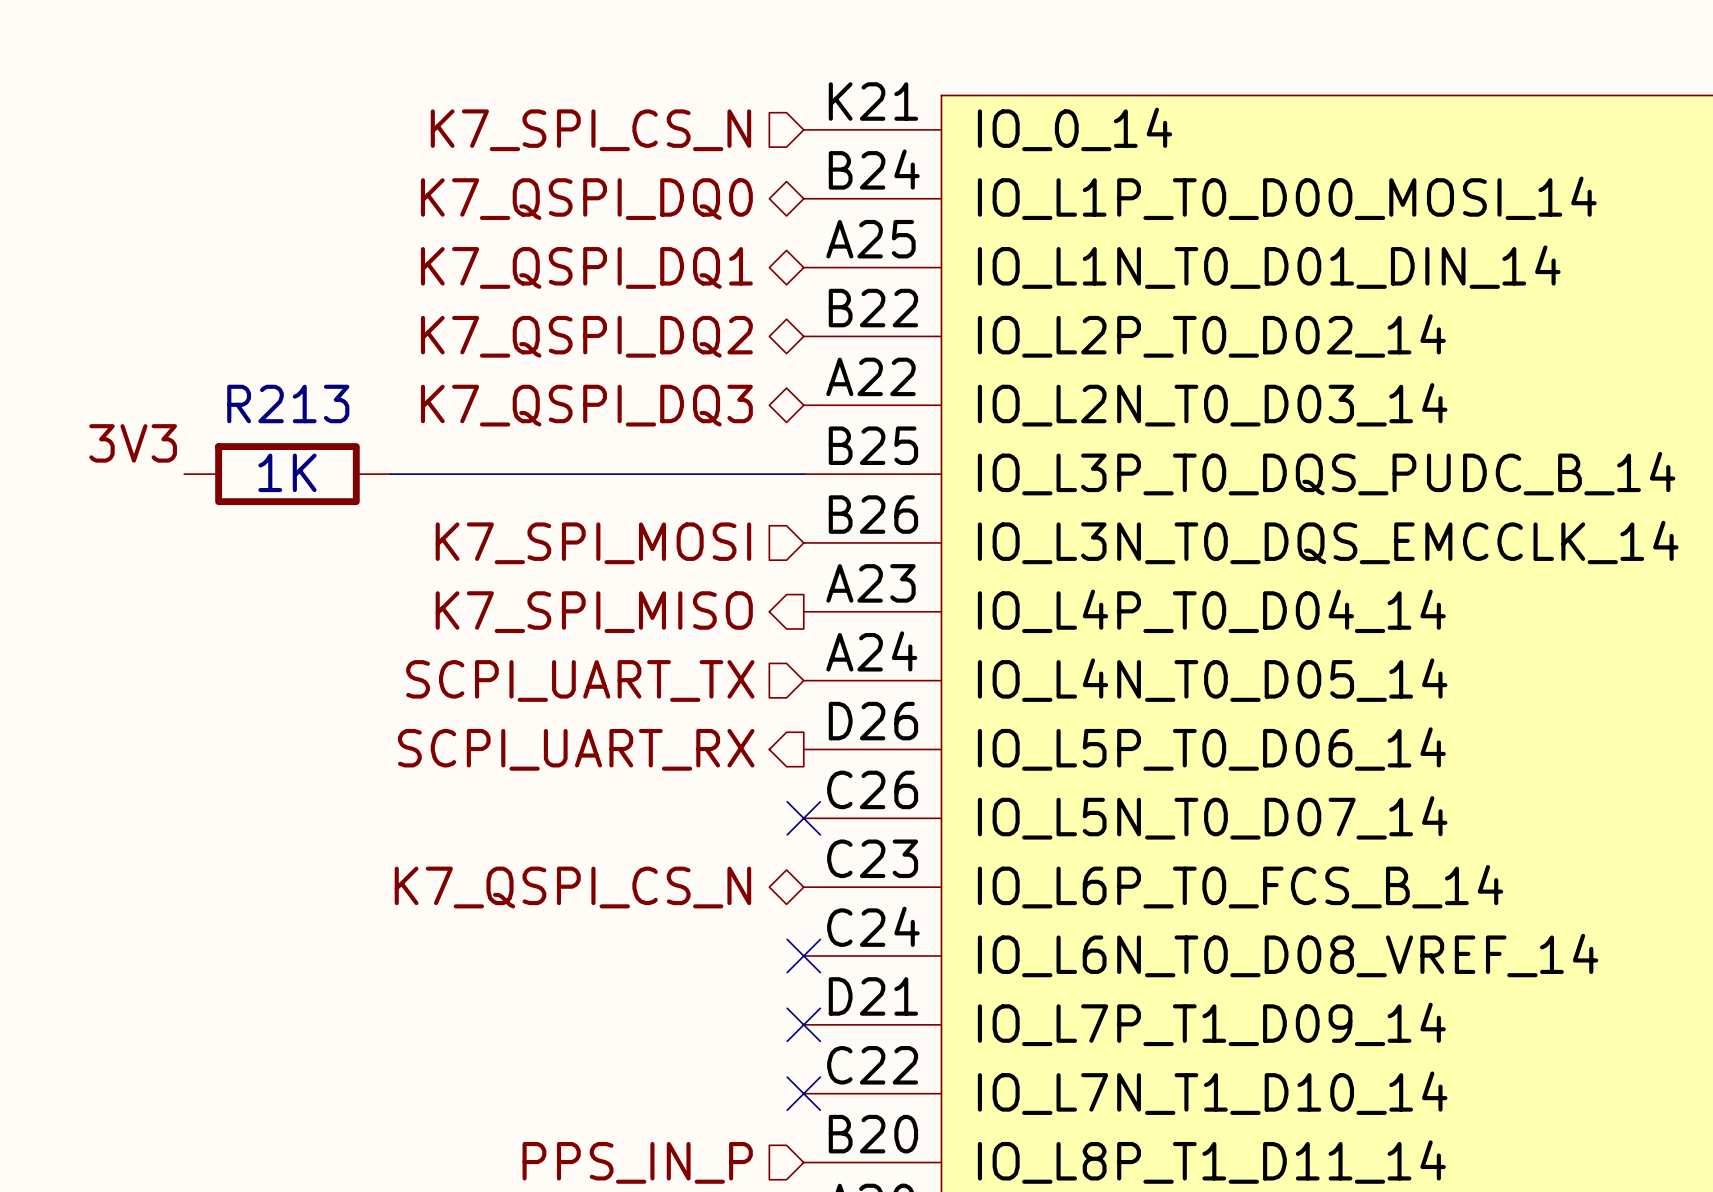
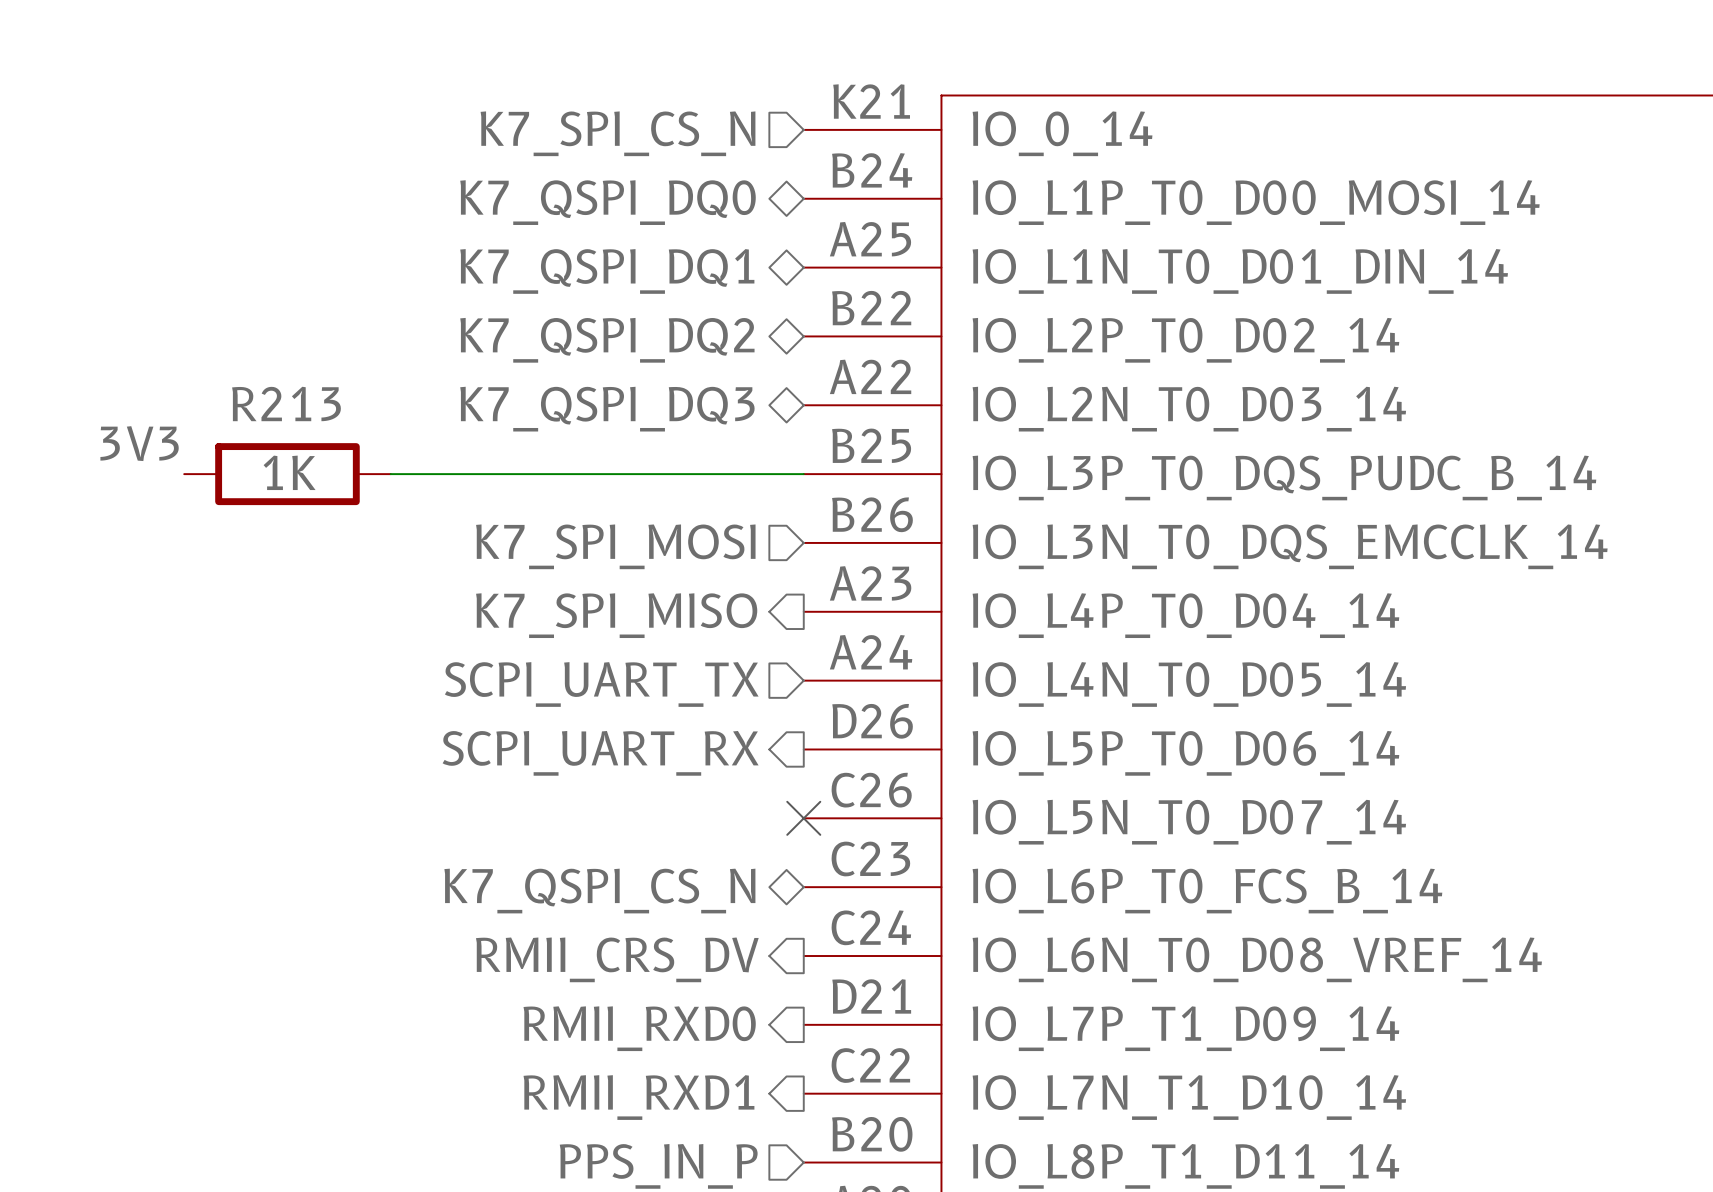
hierarchical label: none -> RMII_CRS_DV (617, 959)
no-connect mark: (803, 956) -> none
no-connect mark: (803, 1024) -> none
hierarchical label: none -> RMII_RXD0 (639, 1028)
no-connect mark: (803, 1093) -> none
hierarchical label: none -> RMII_RXD1 (638, 1097)

